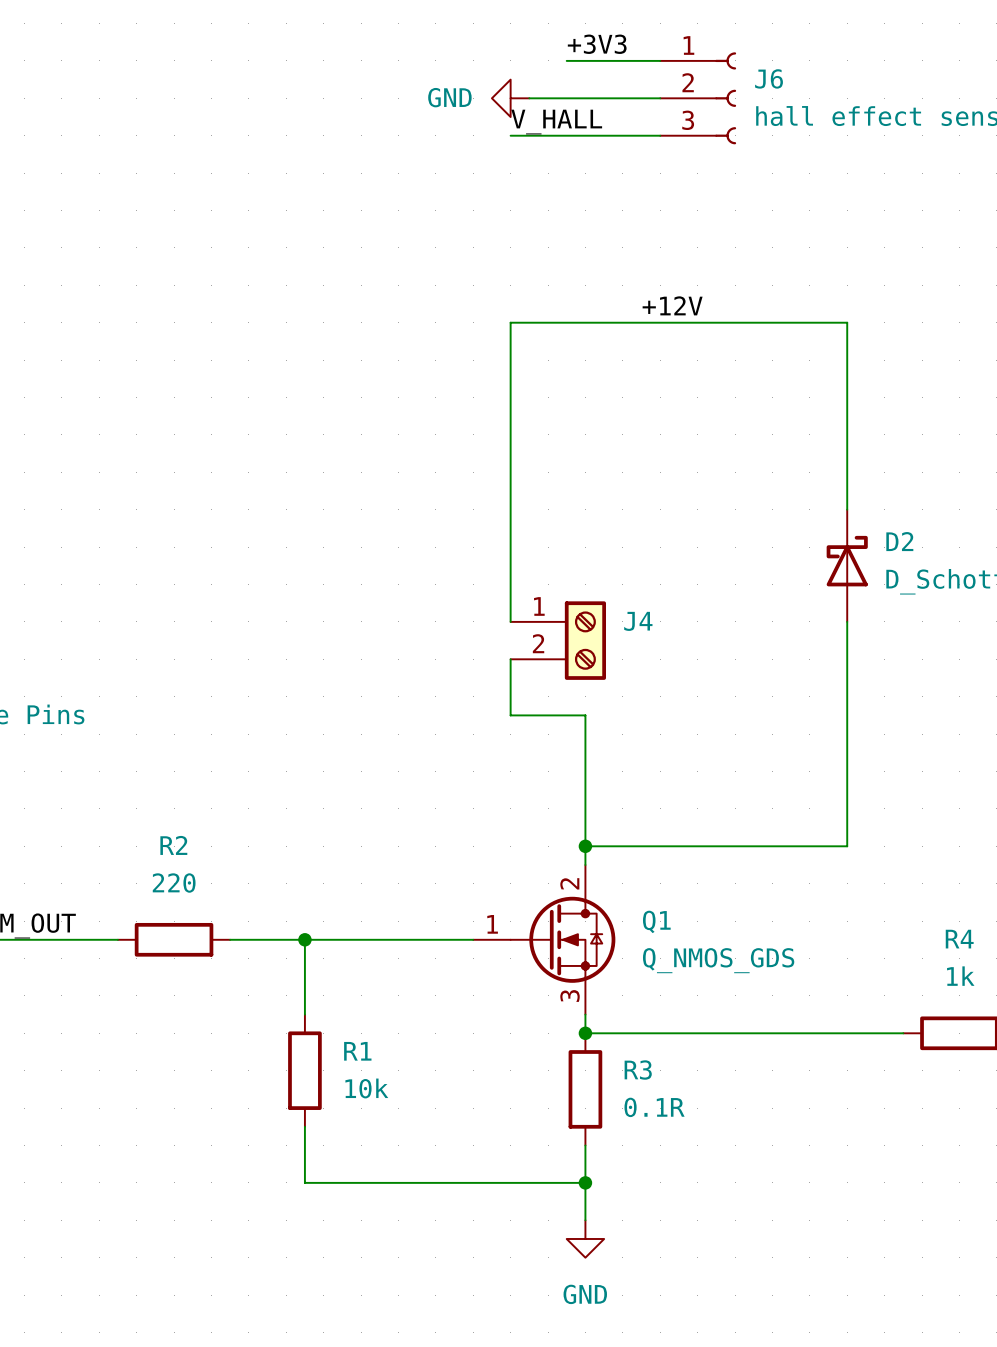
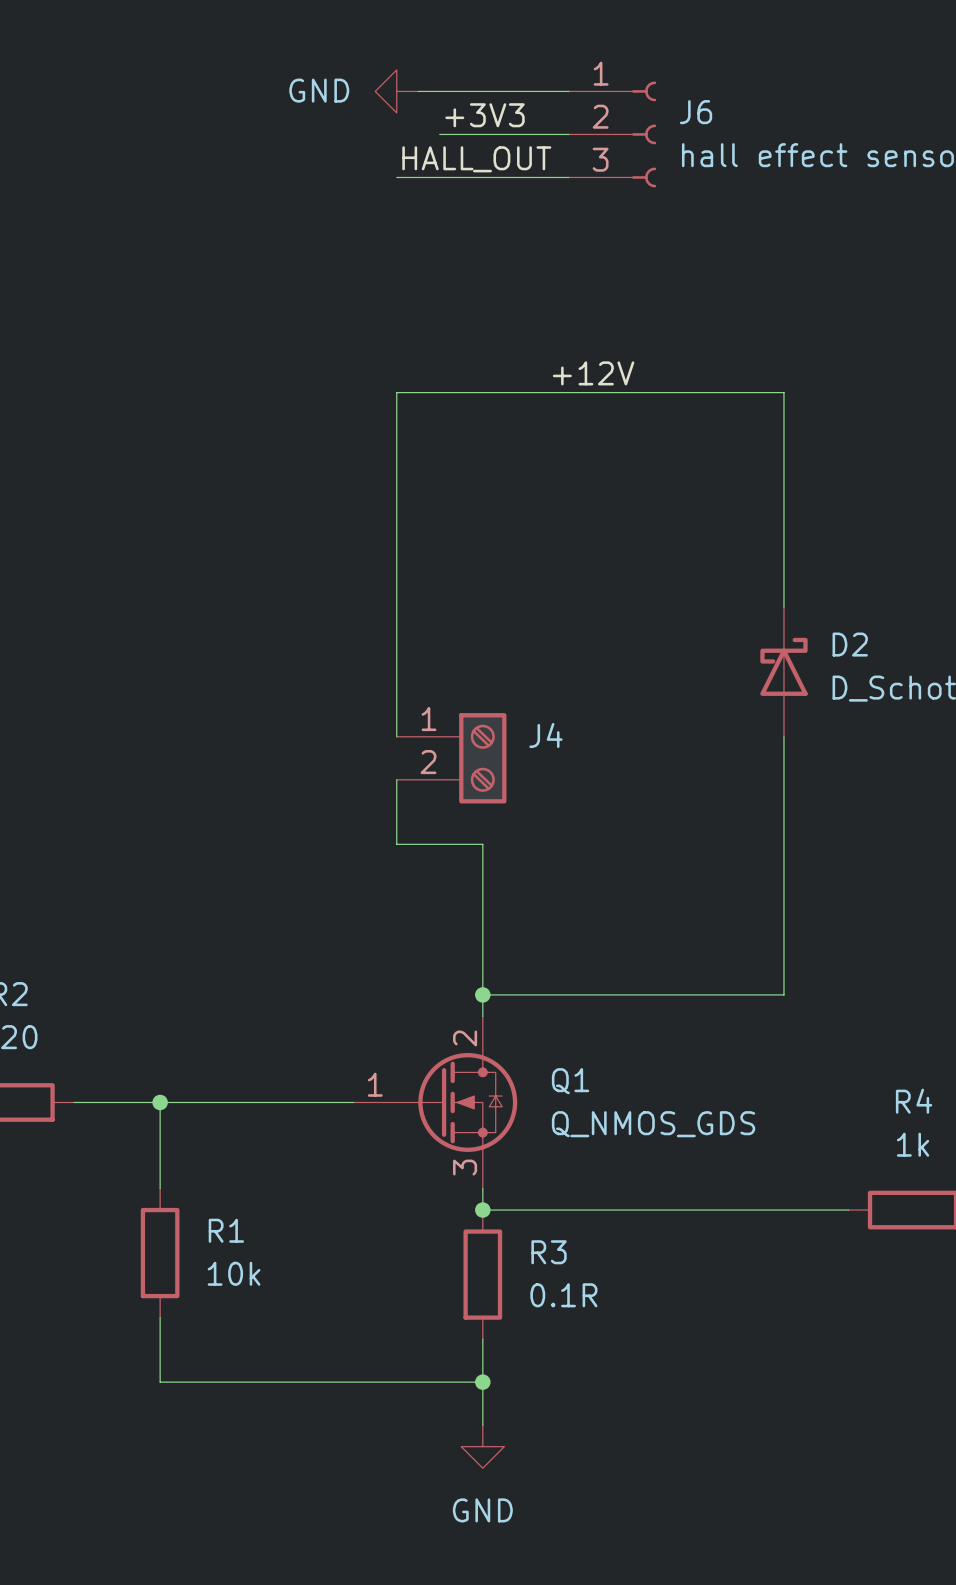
label position: +3V3 (597, 44) -> +3V3 (485, 115)
wire: none -> (418, 91) (461, 91)
power symbol position: GND (510, 98) -> GND (396, 91)
wire: (529, 98) (548, 98) -> none
label: V_HALL (556, 122) -> HALL_OUT (476, 159)

